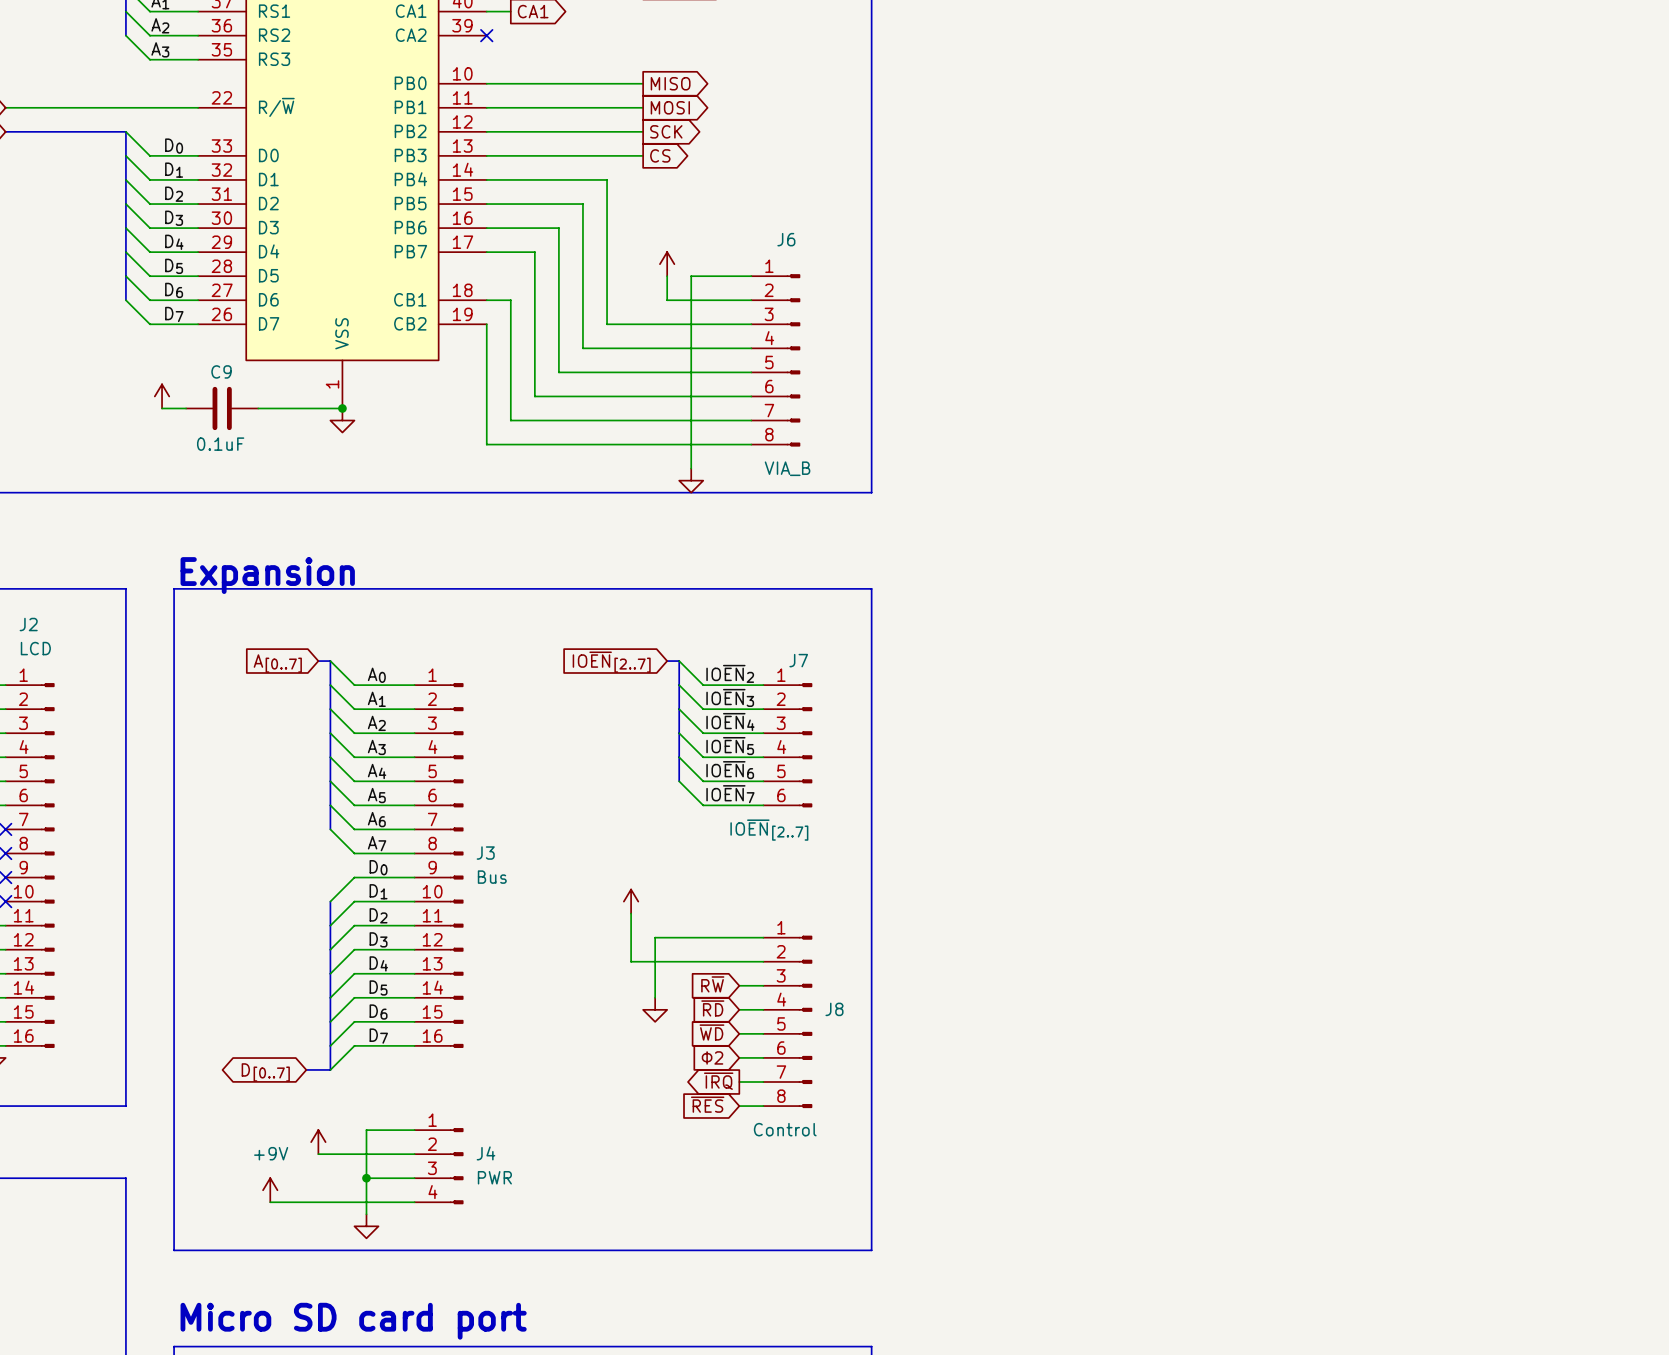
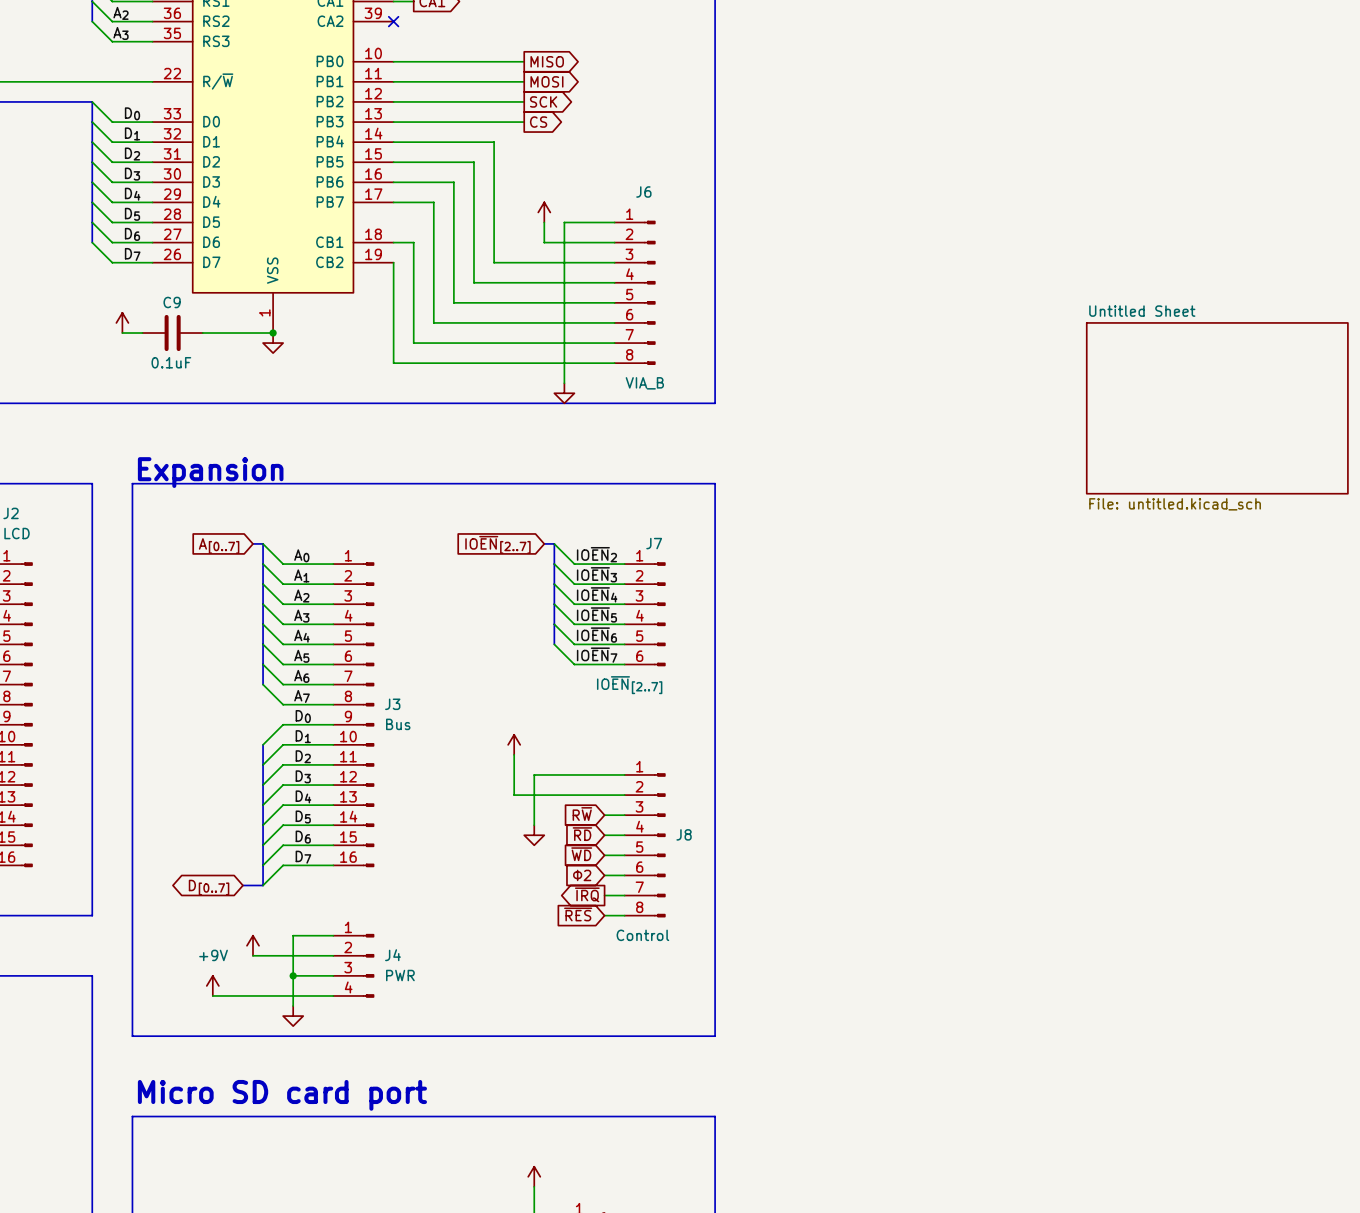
sheet Untitled Sheet: none -> File: untitled.kicad_sch (1217, 408)

